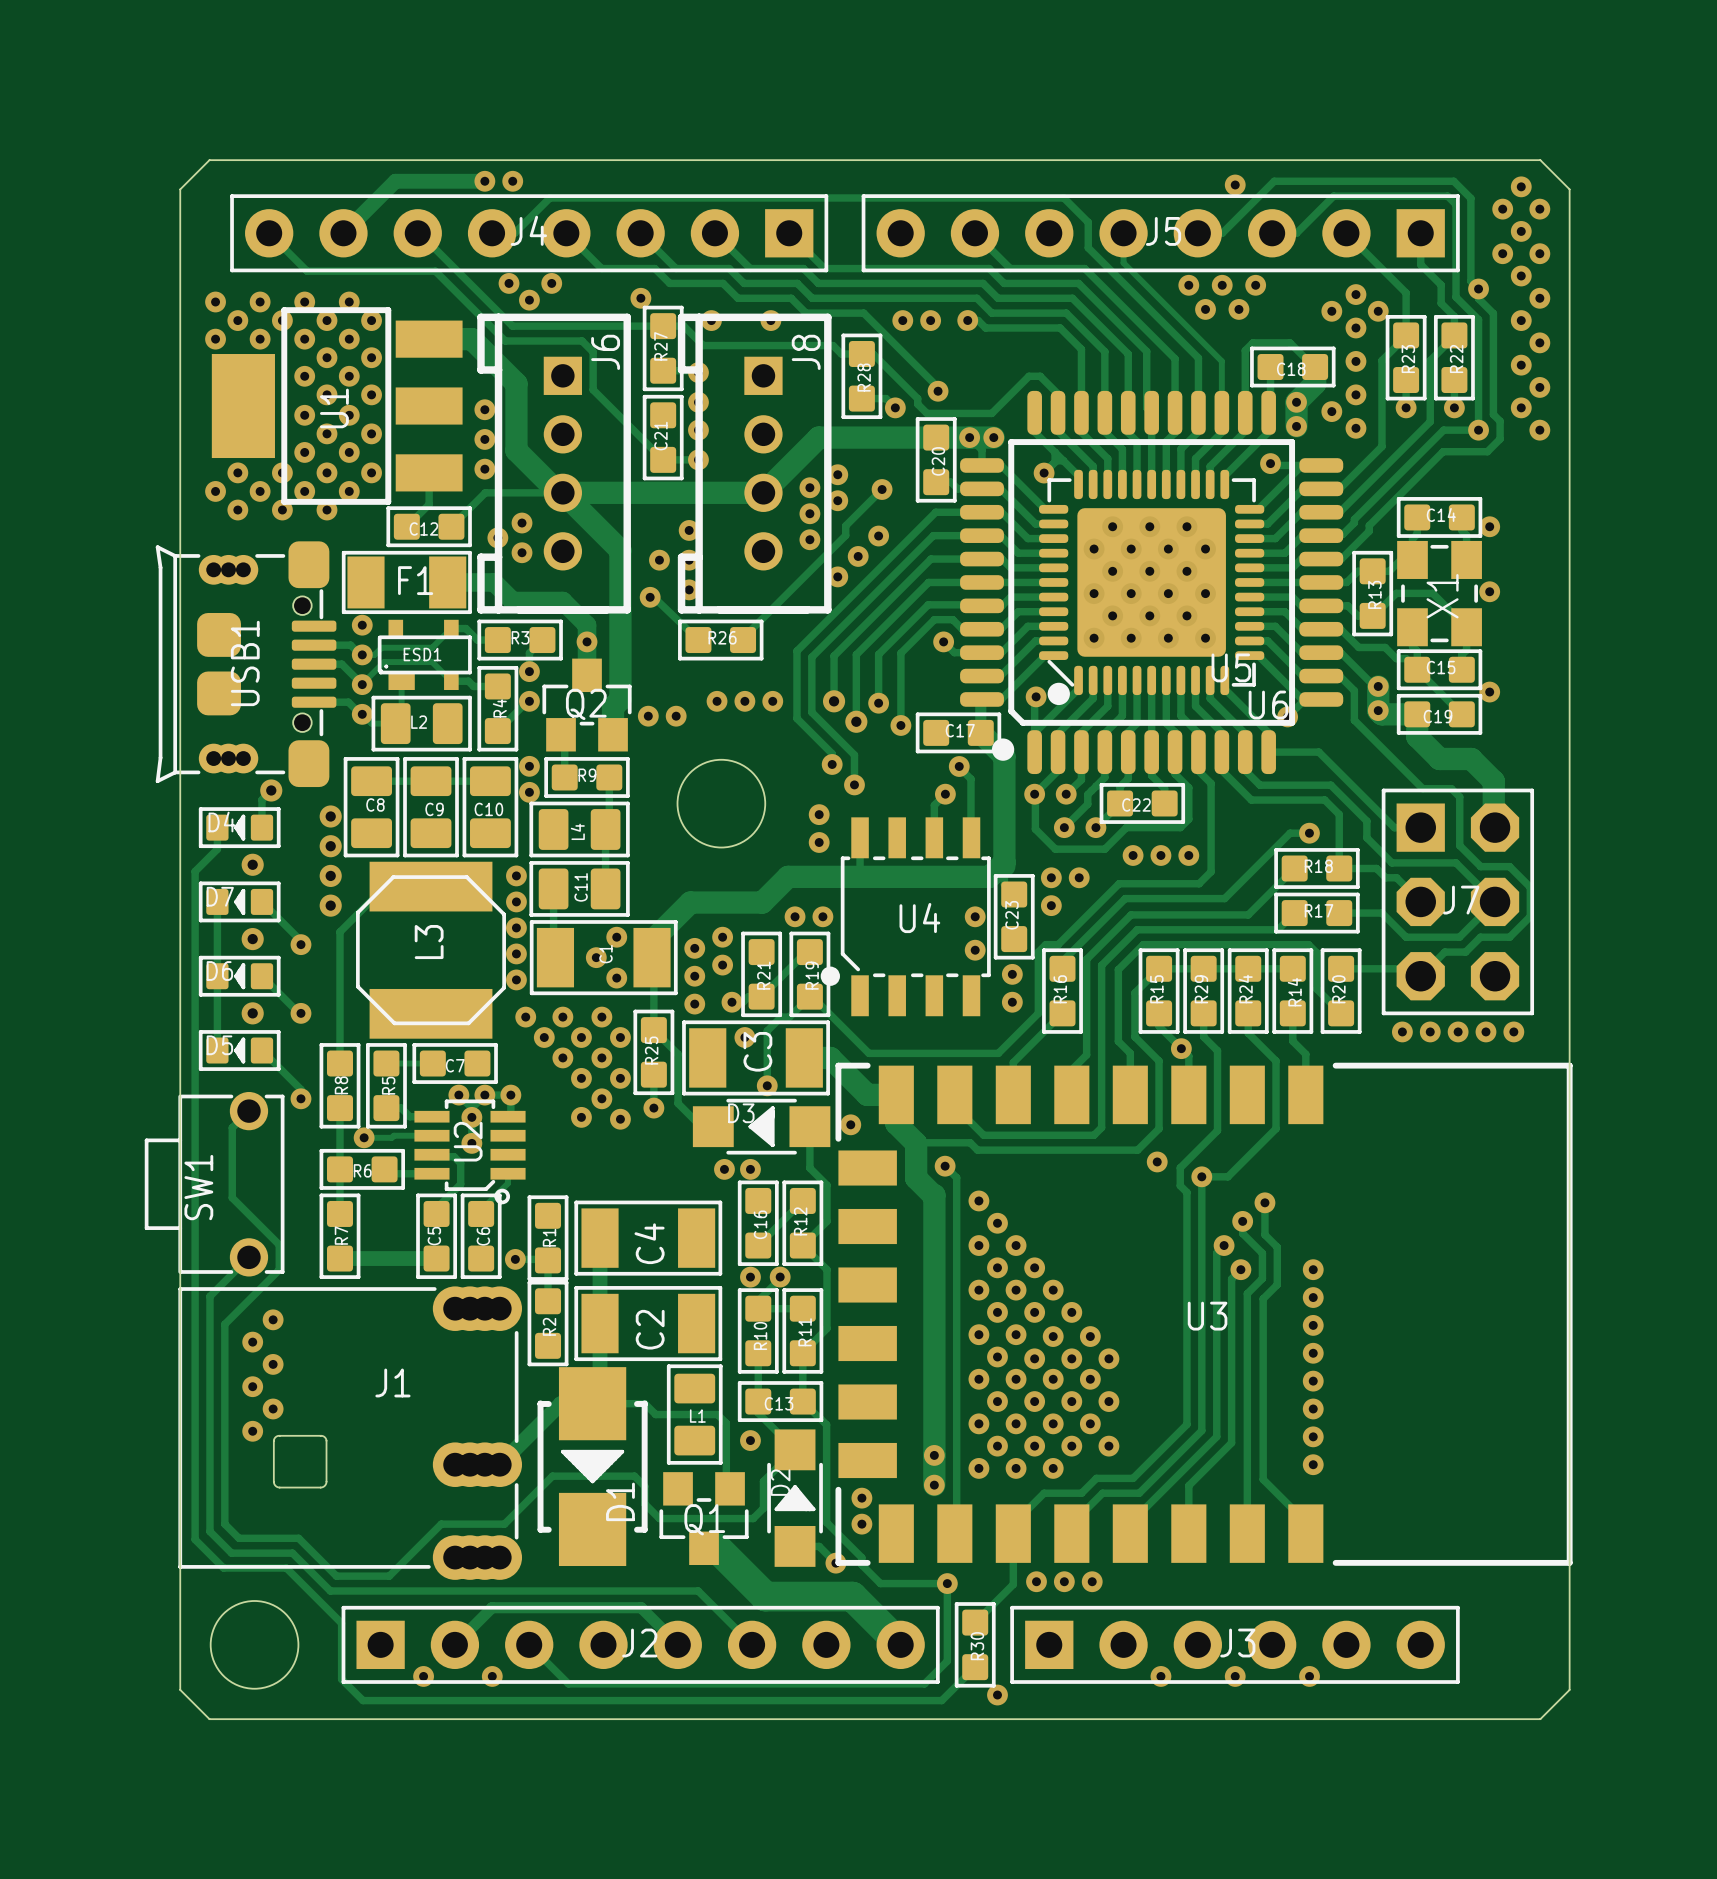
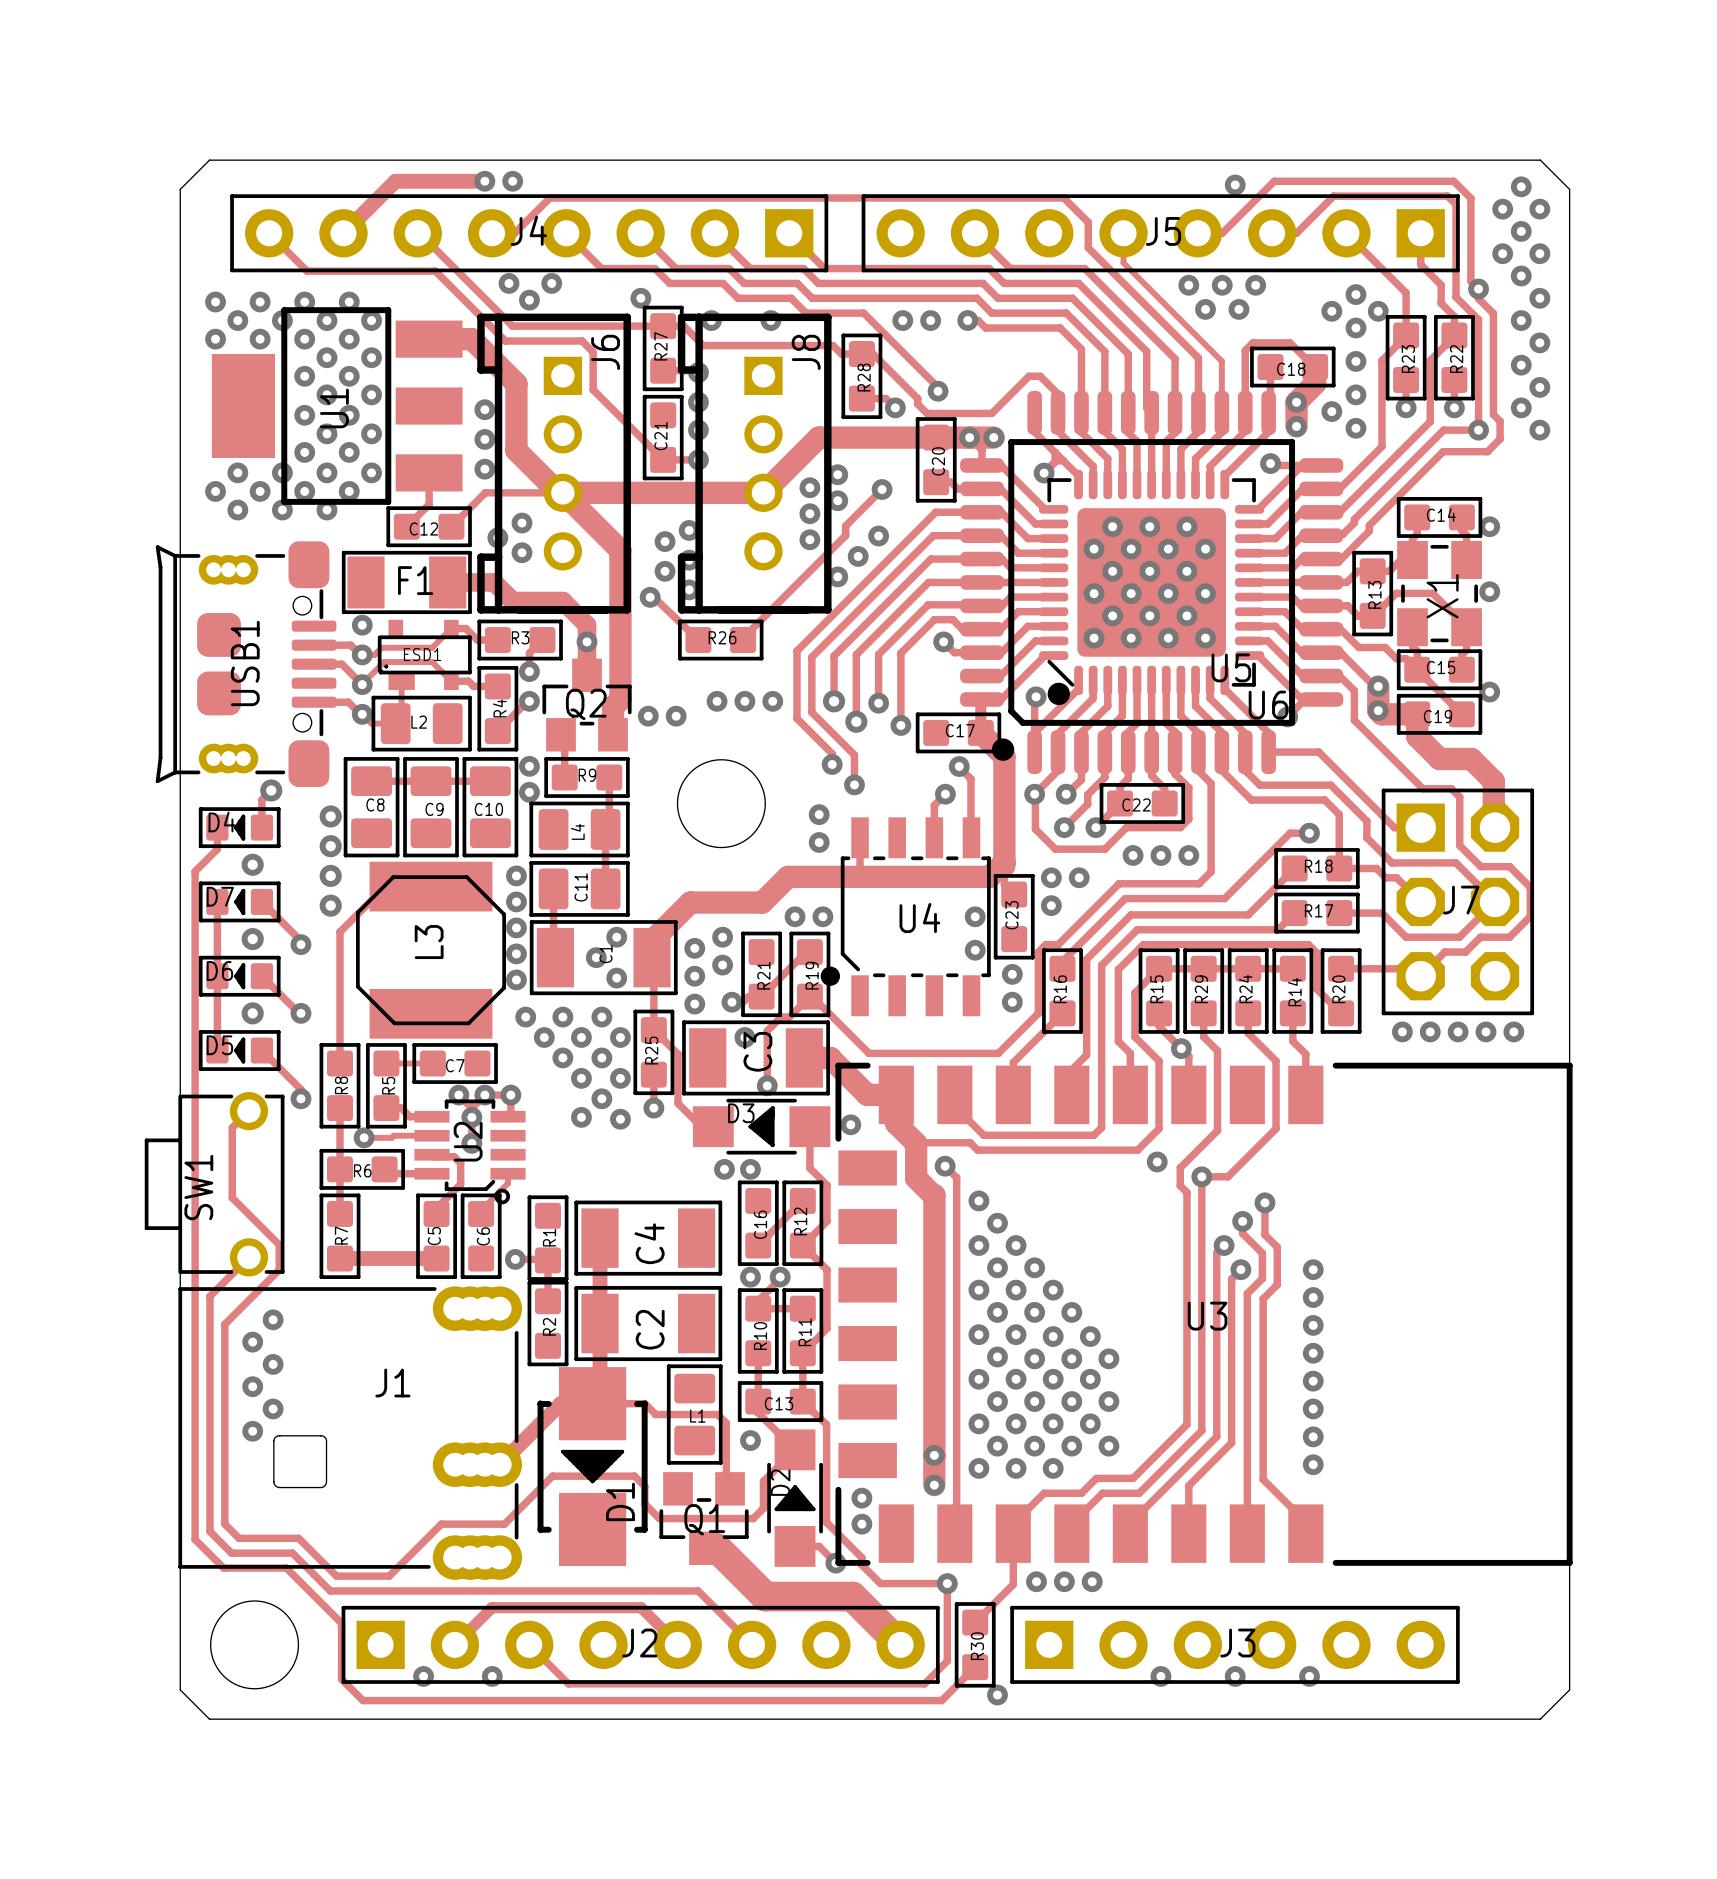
via: none -> (665, 541)
via: (659, 560) -> none
via: none -> (665, 571)

